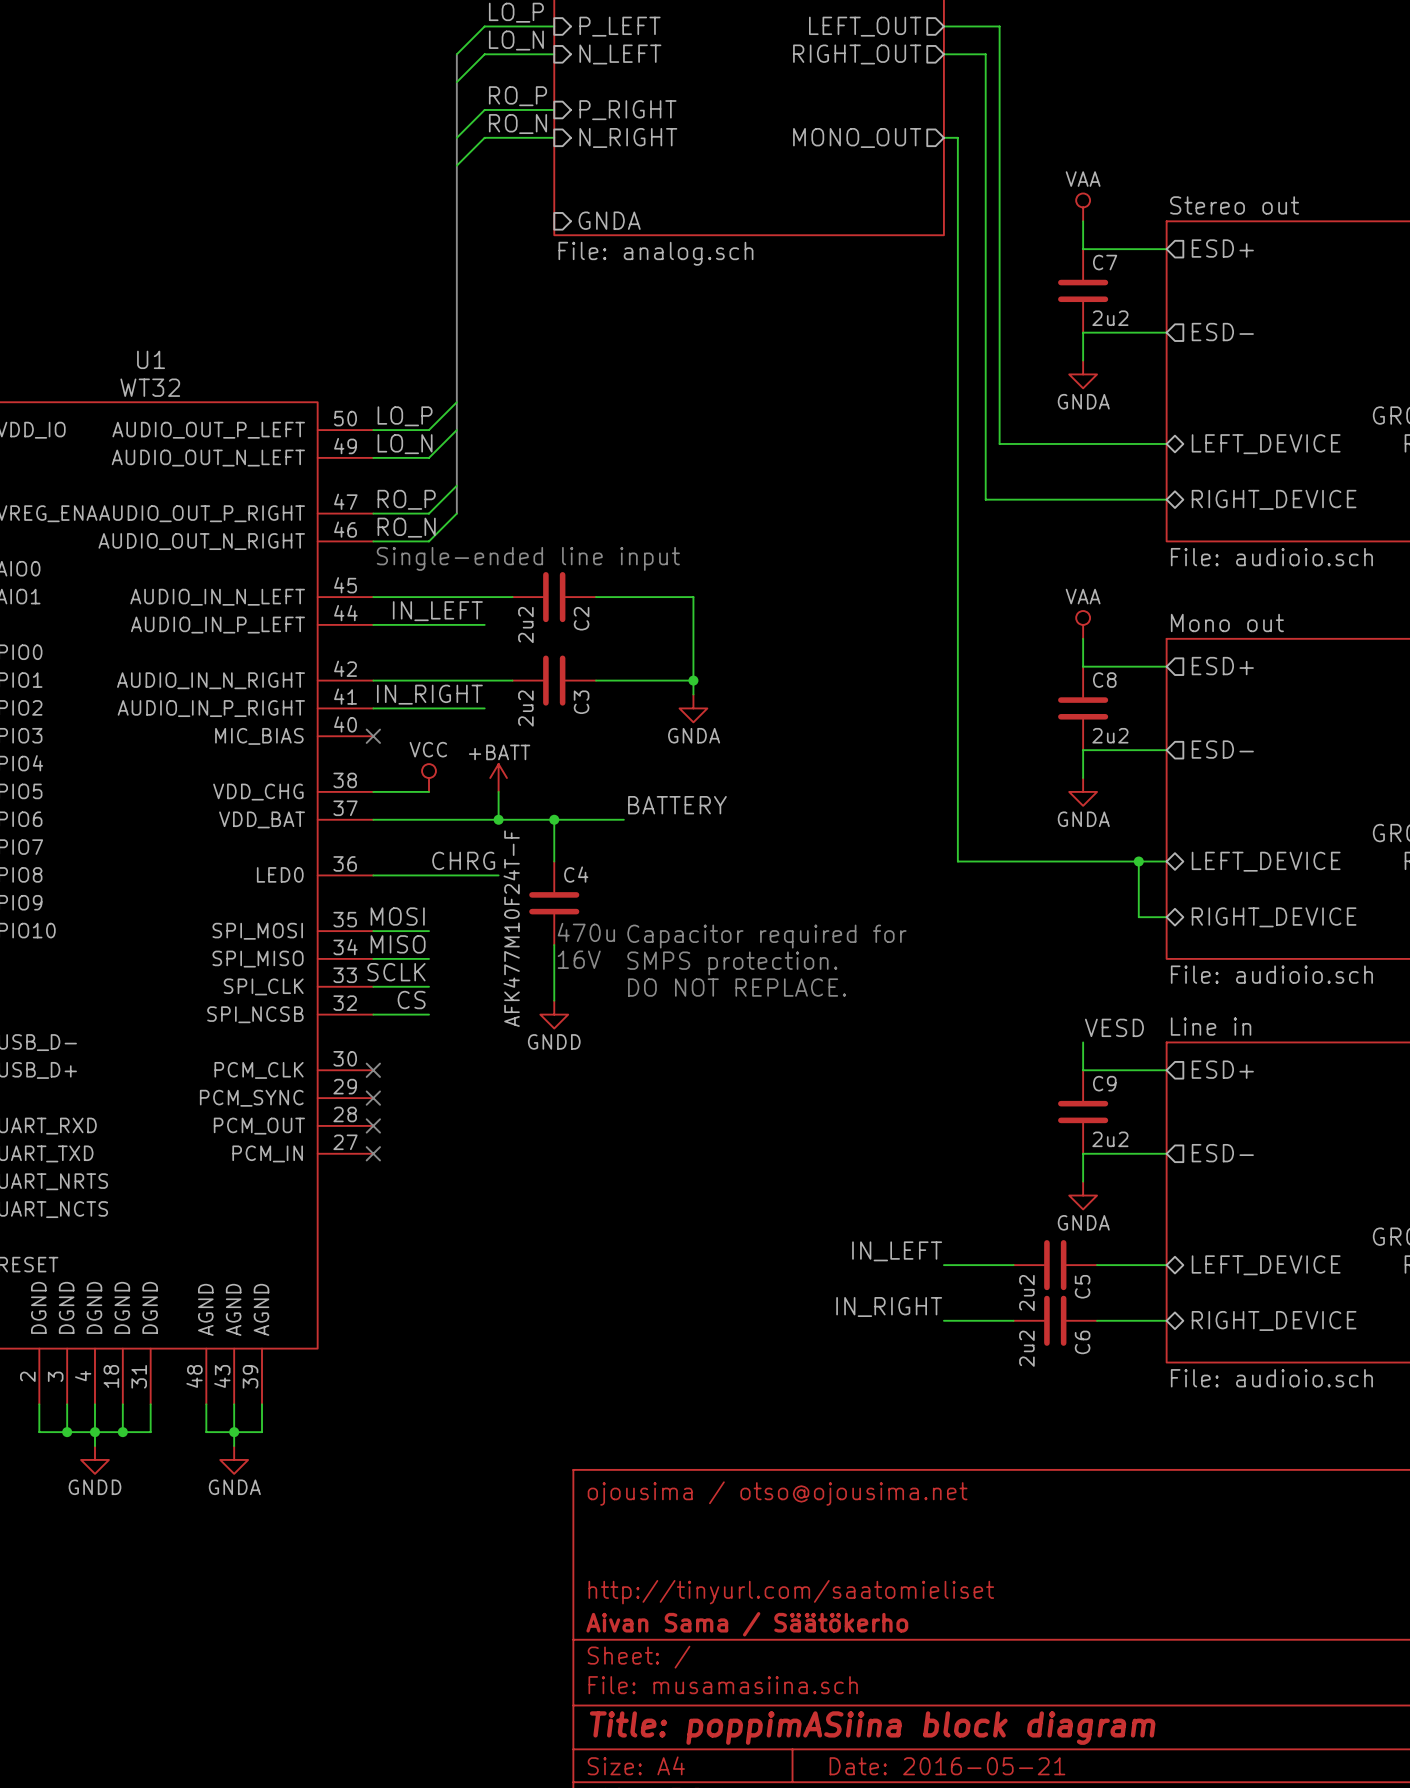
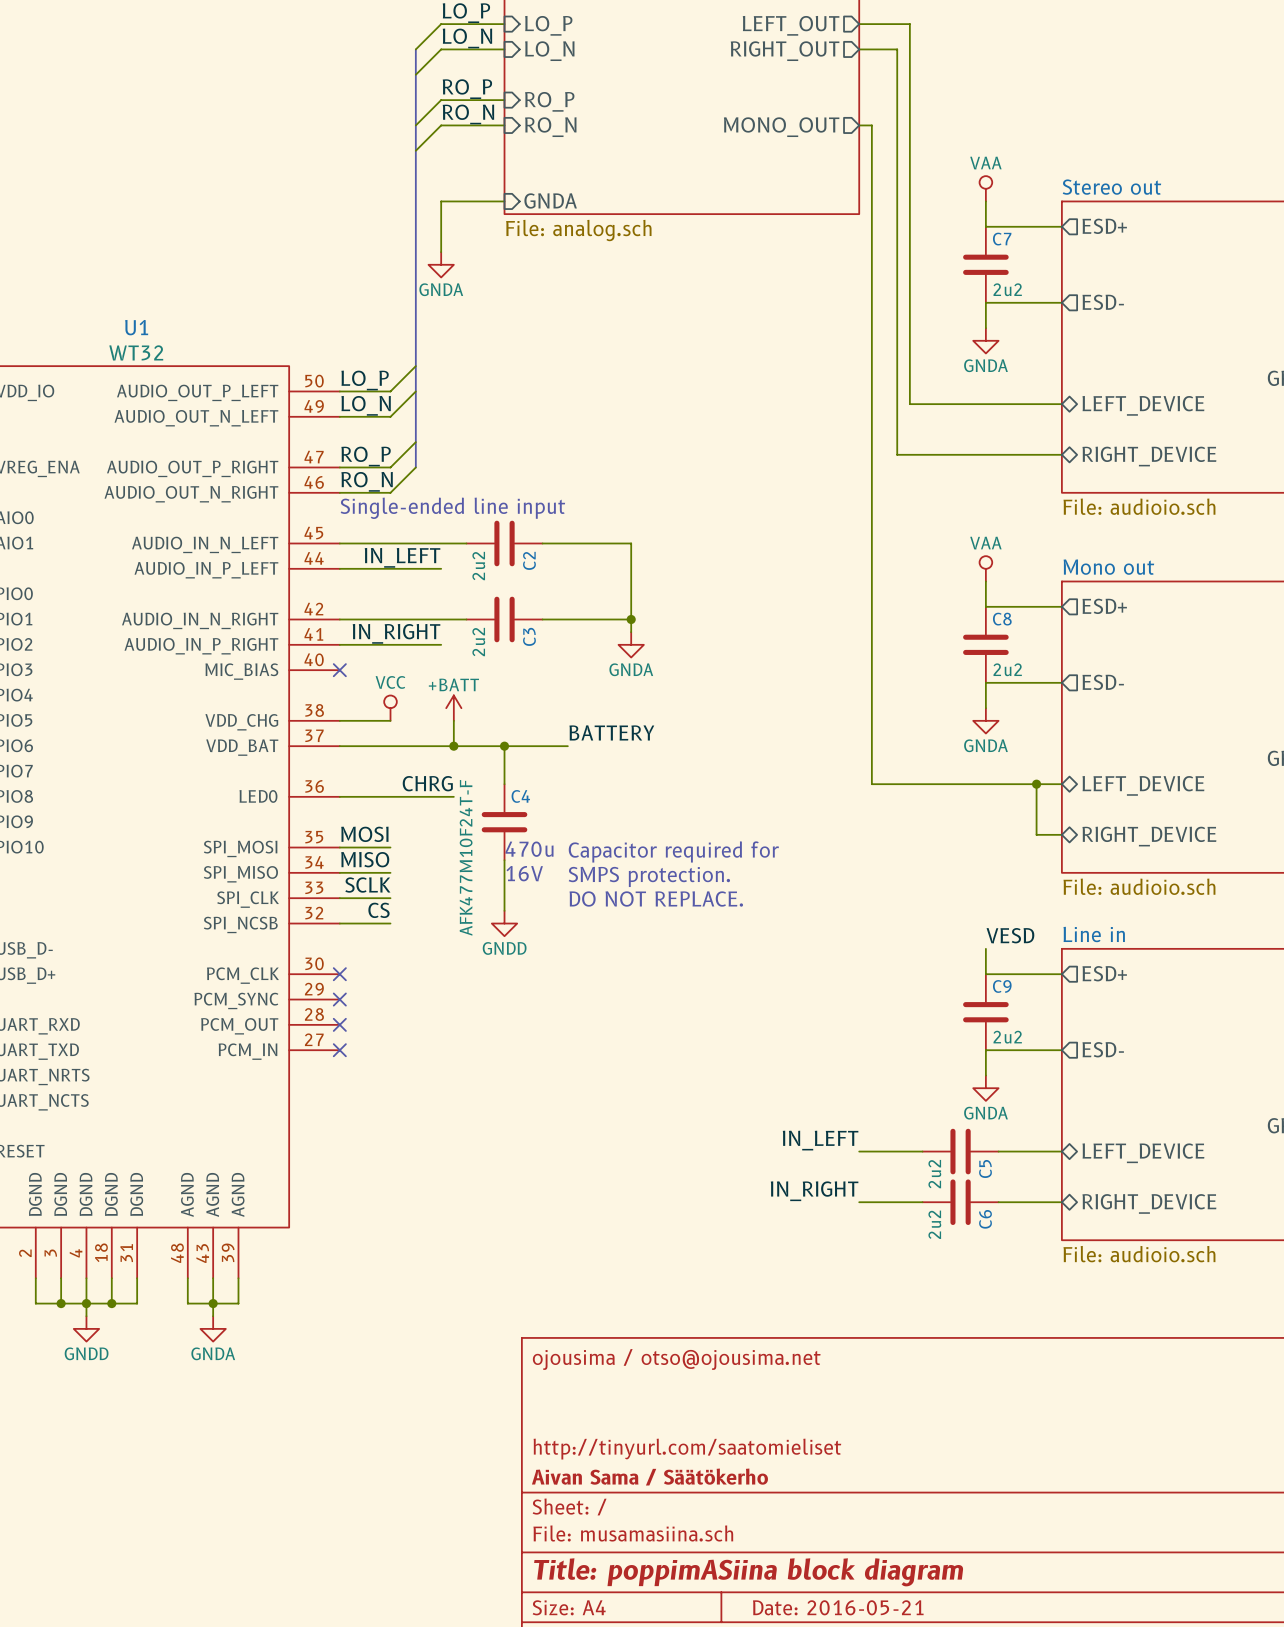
sheet pin: P_LEFT (619, 26) -> LO_P (548, 25)
sheet pin: N_LEFT (620, 54) -> LO_N (549, 51)
sheet pin: P_RIGHT (627, 110) -> RO_P (549, 101)
sheet pin: N_RIGHT (628, 137) -> RO_N (550, 127)
wire: none -> (504, 201) (441, 201) (441, 252)
power symbol: none -> GNDA (441, 264)

